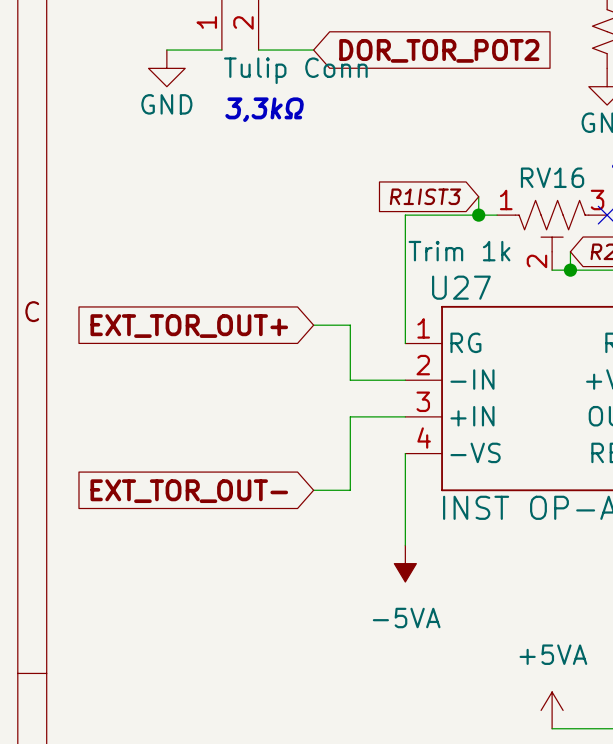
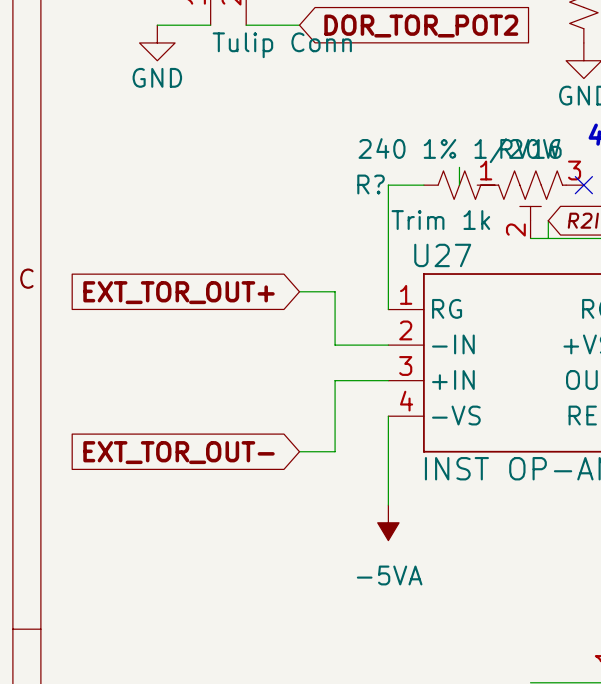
text: 3,3kΩ (264, 109) -> none
global label: R1IST3 (425, 196) -> none
wire: (442, 215) (497, 215) -> none
junction: (478, 215) -> none
R?: none -> 240 1% 1/20W (459, 185)
junction: (570, 270) -> none
power symbol: +5VA (552, 710) -> none

